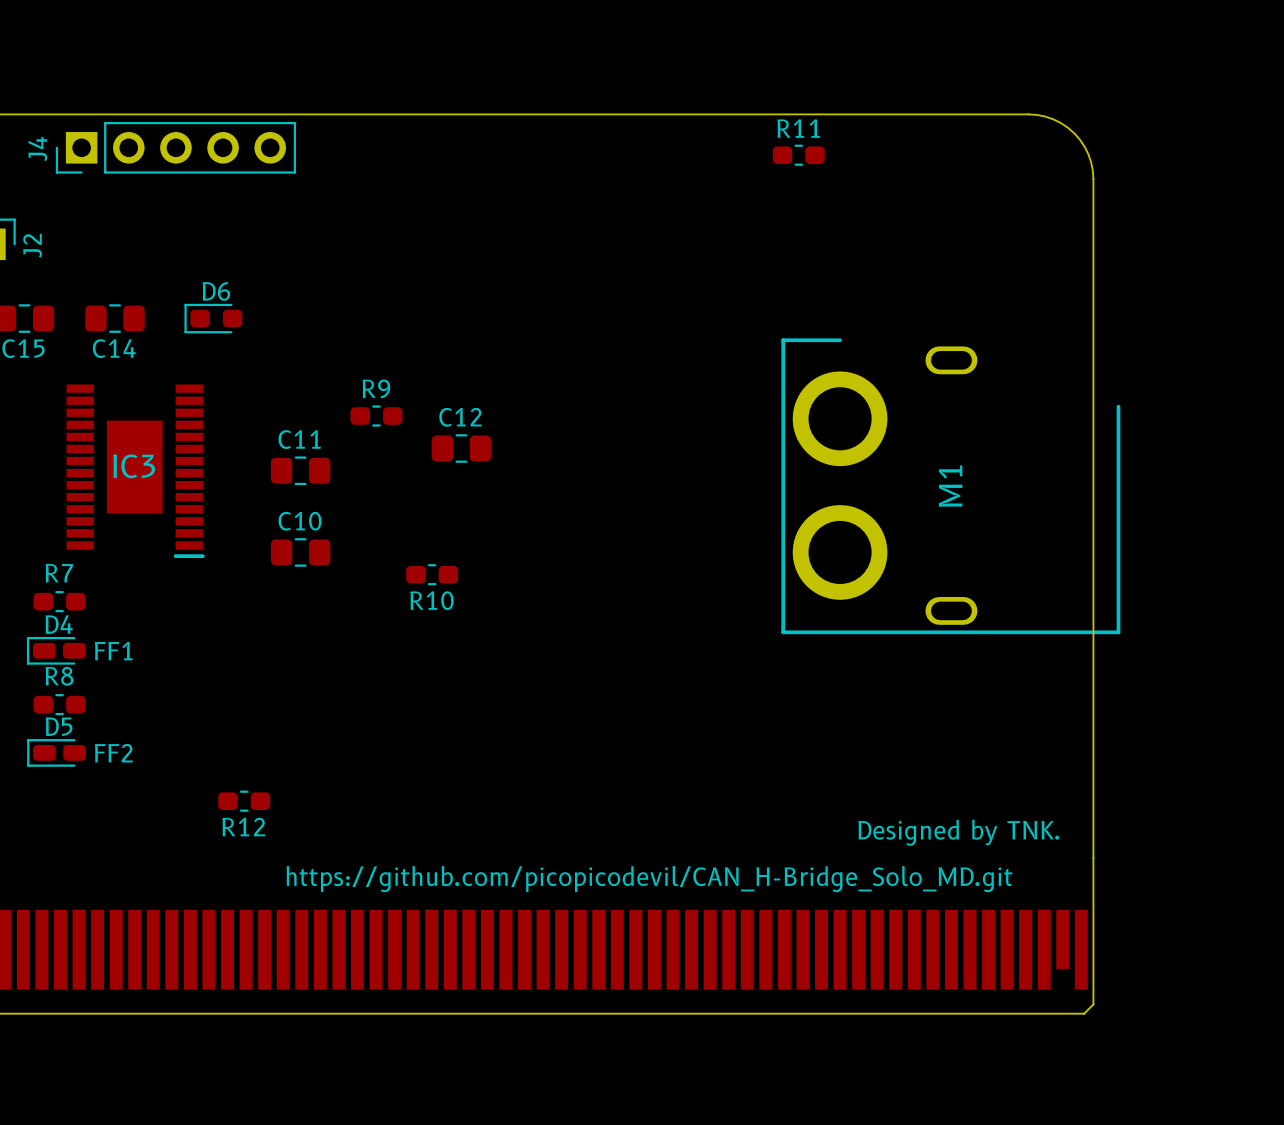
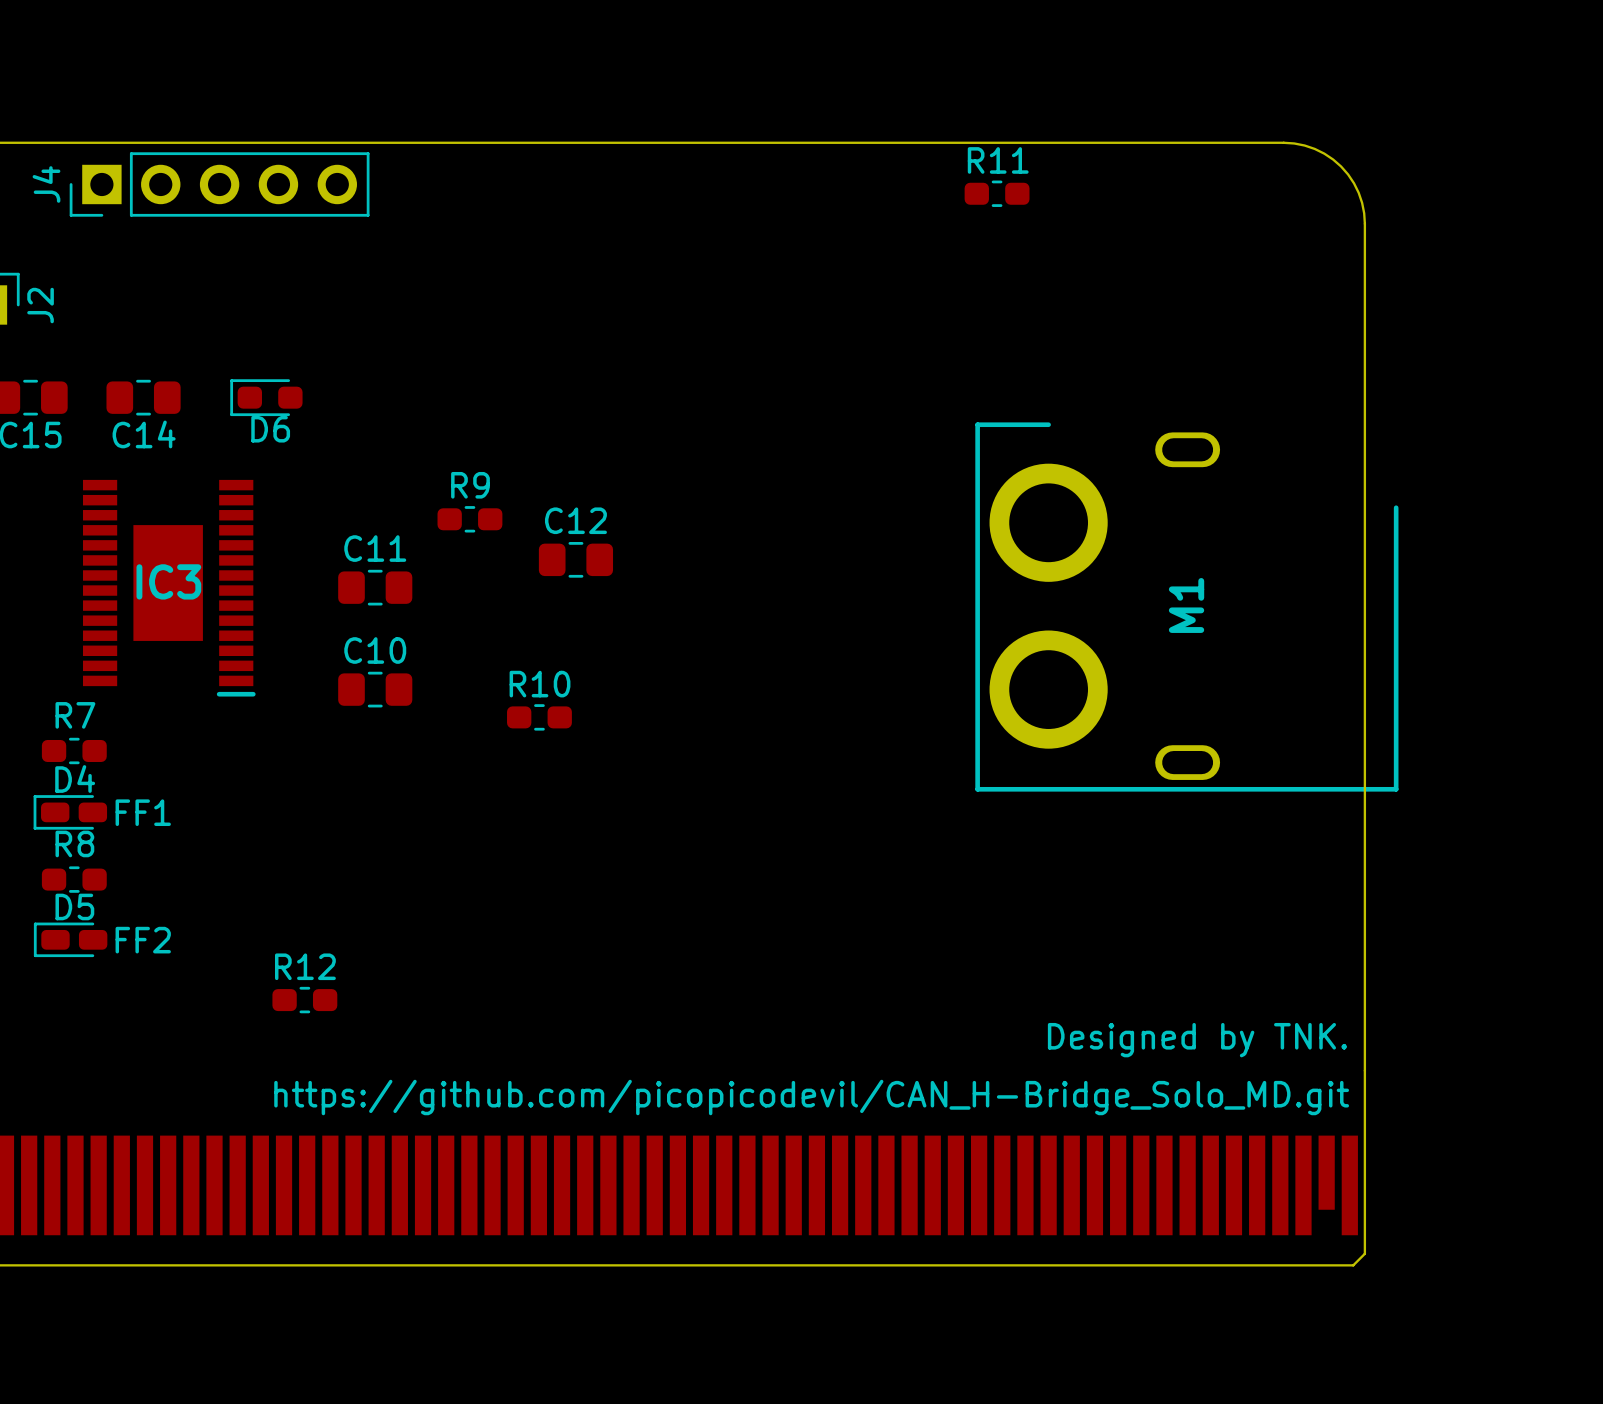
D6 name position: D6 (216, 291) -> D6 (270, 429)
R10 name position: R10 (431, 600) -> R10 (540, 684)
R12 name position: R12 (243, 827) -> R12 (305, 966)

